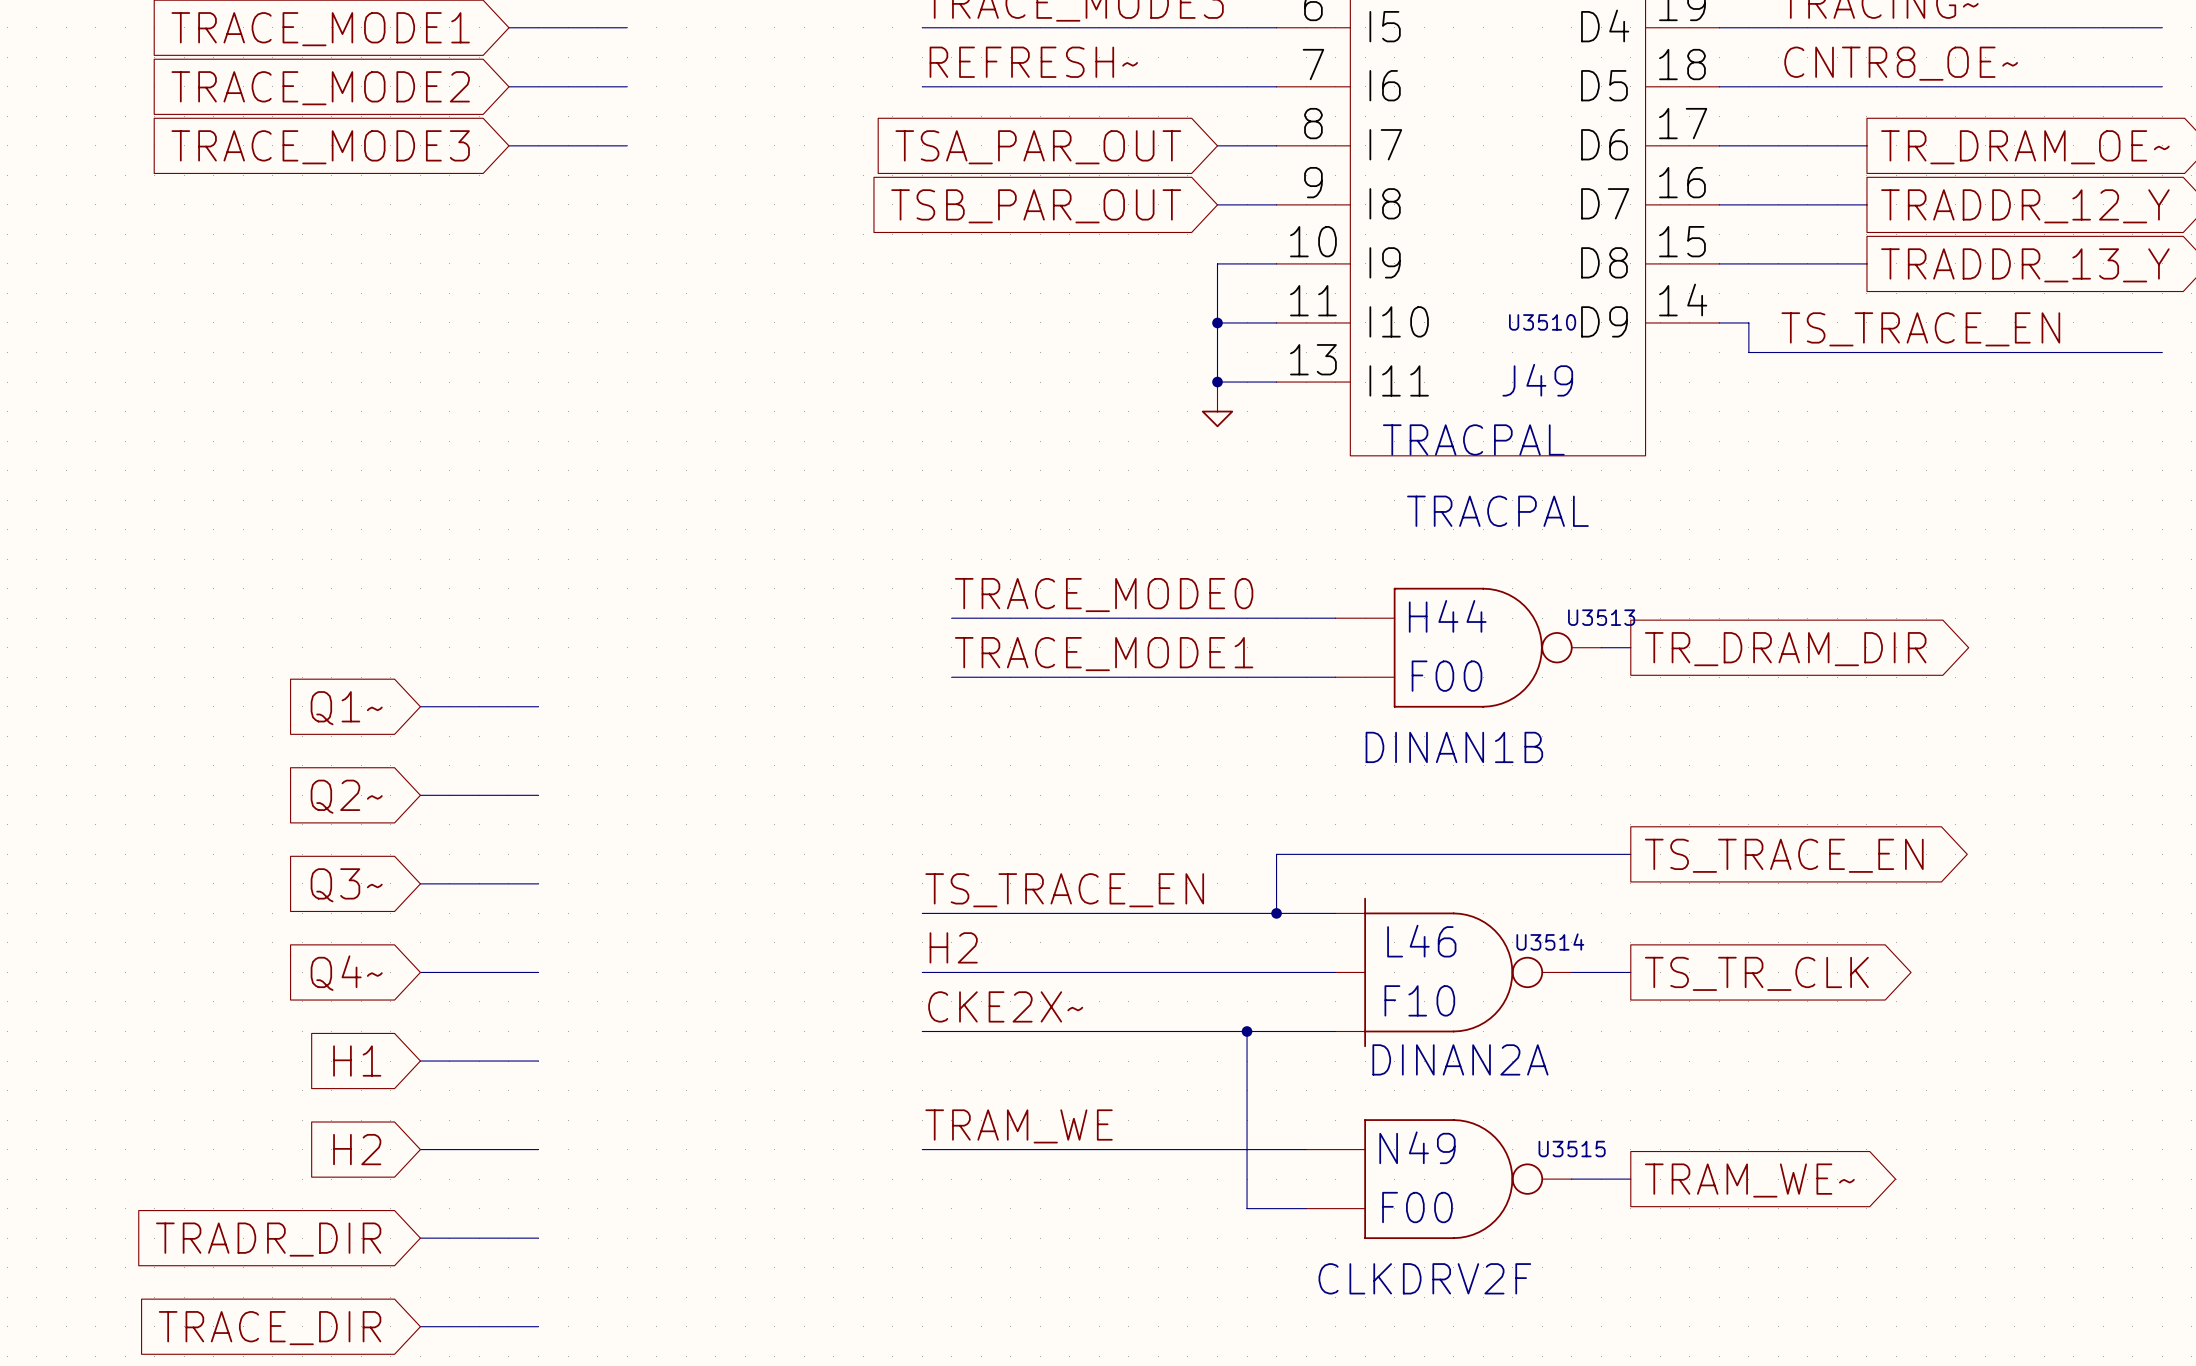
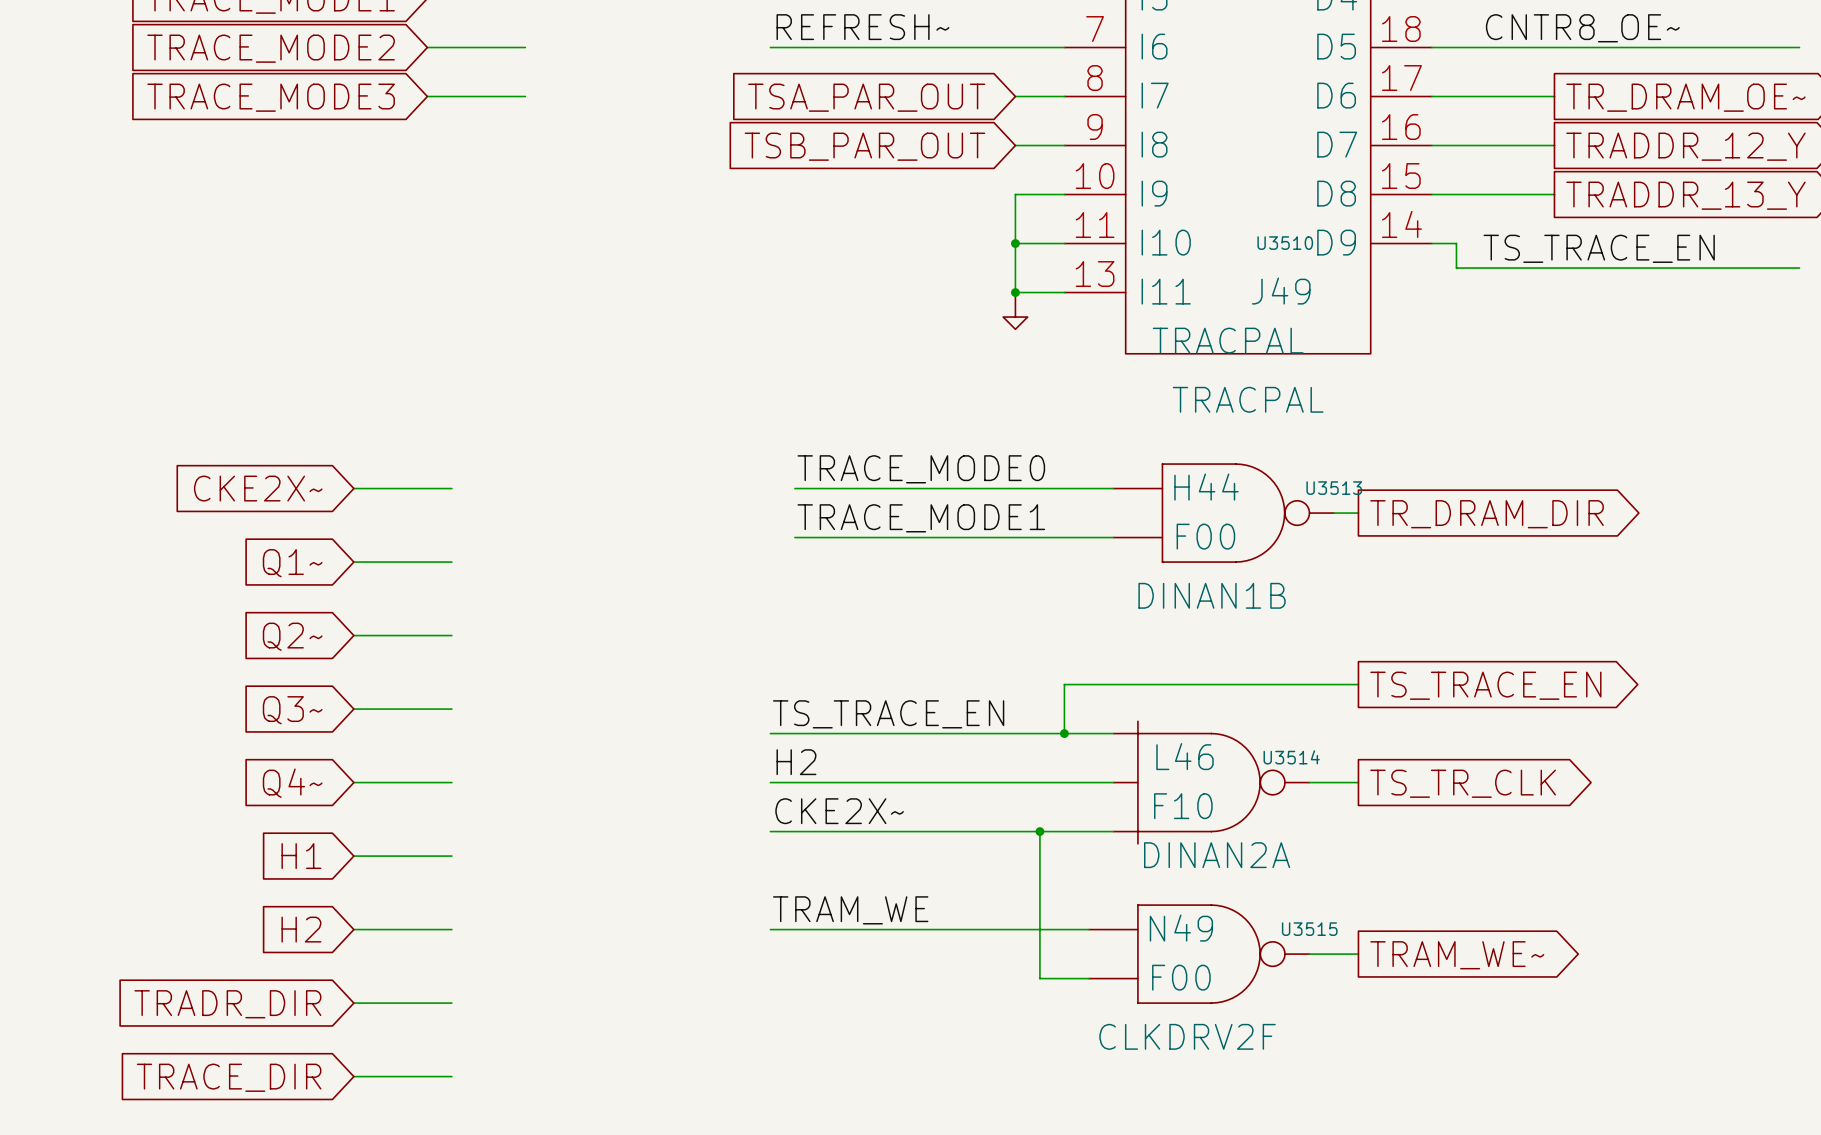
global label: none -> CKE2X~ (258, 488)
wire: none -> (353, 488) (451, 488)

